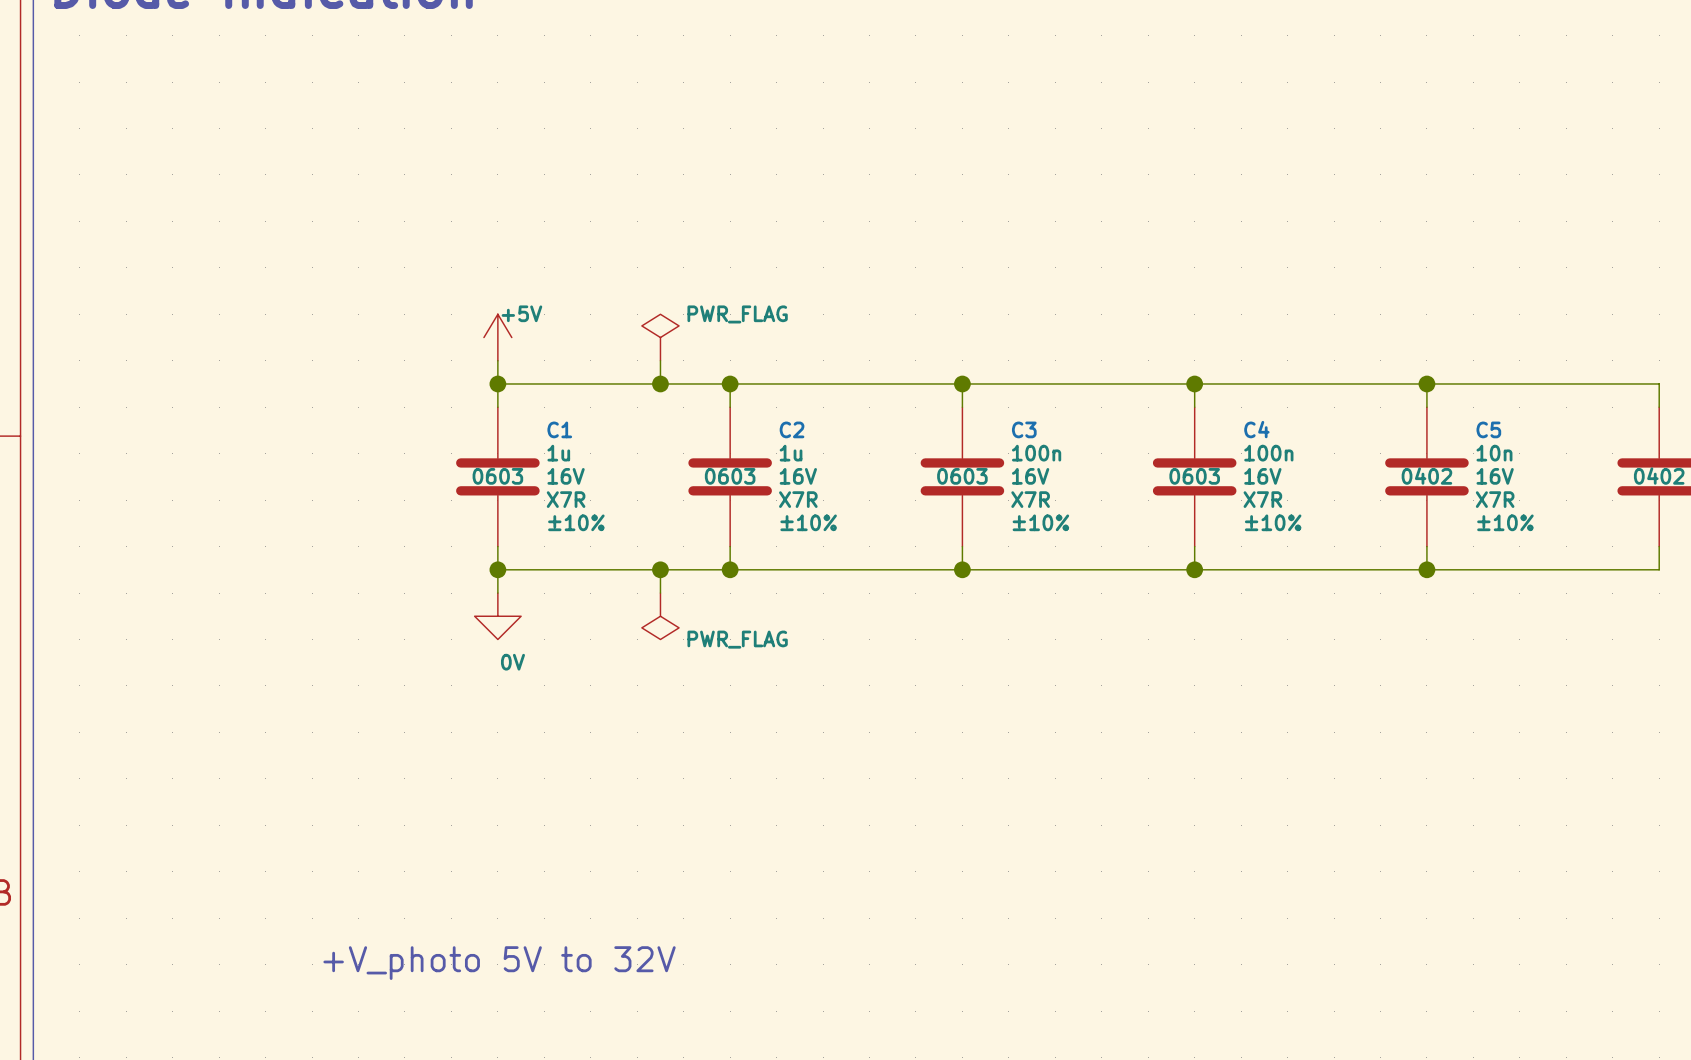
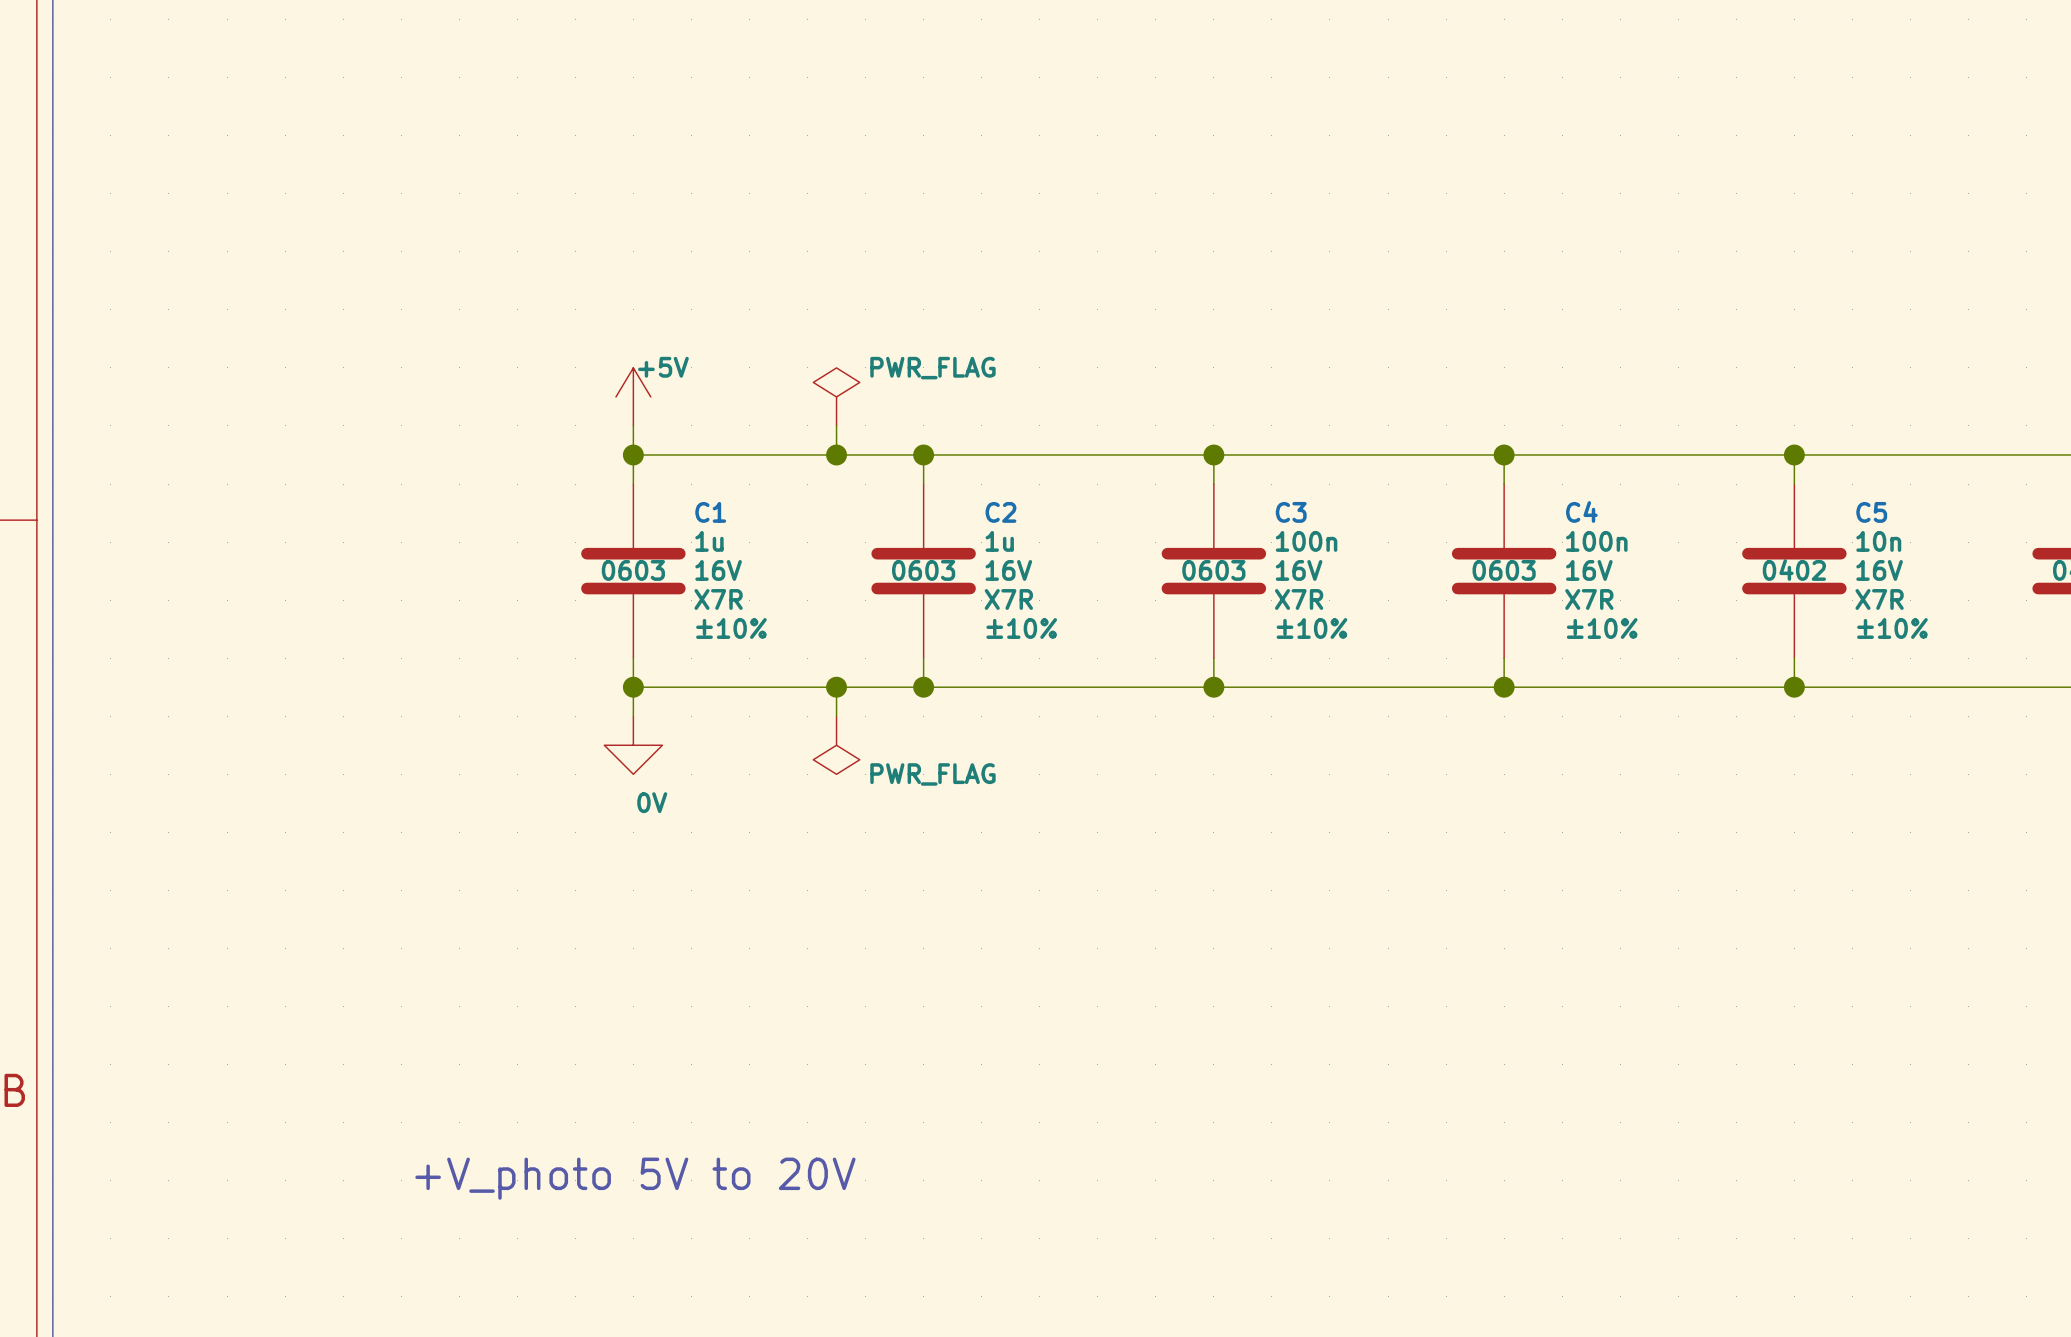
text: +V_photo 5V to 32V (499, 963) -> +V_photo 5V to 20V (635, 1178)

